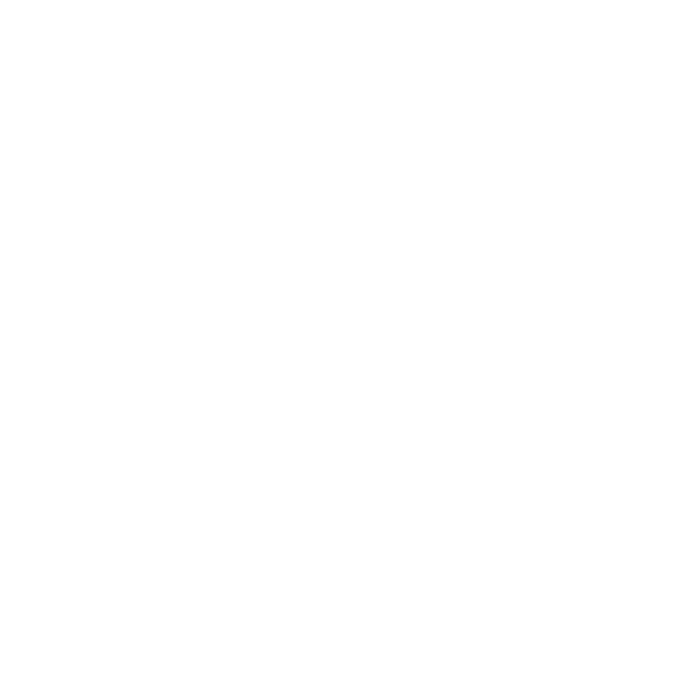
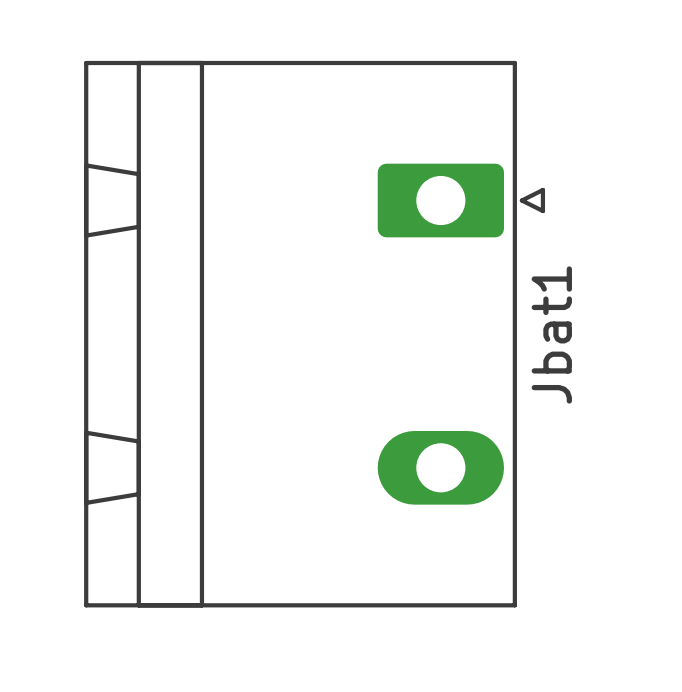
Jbat1: none -> (314, 334)

